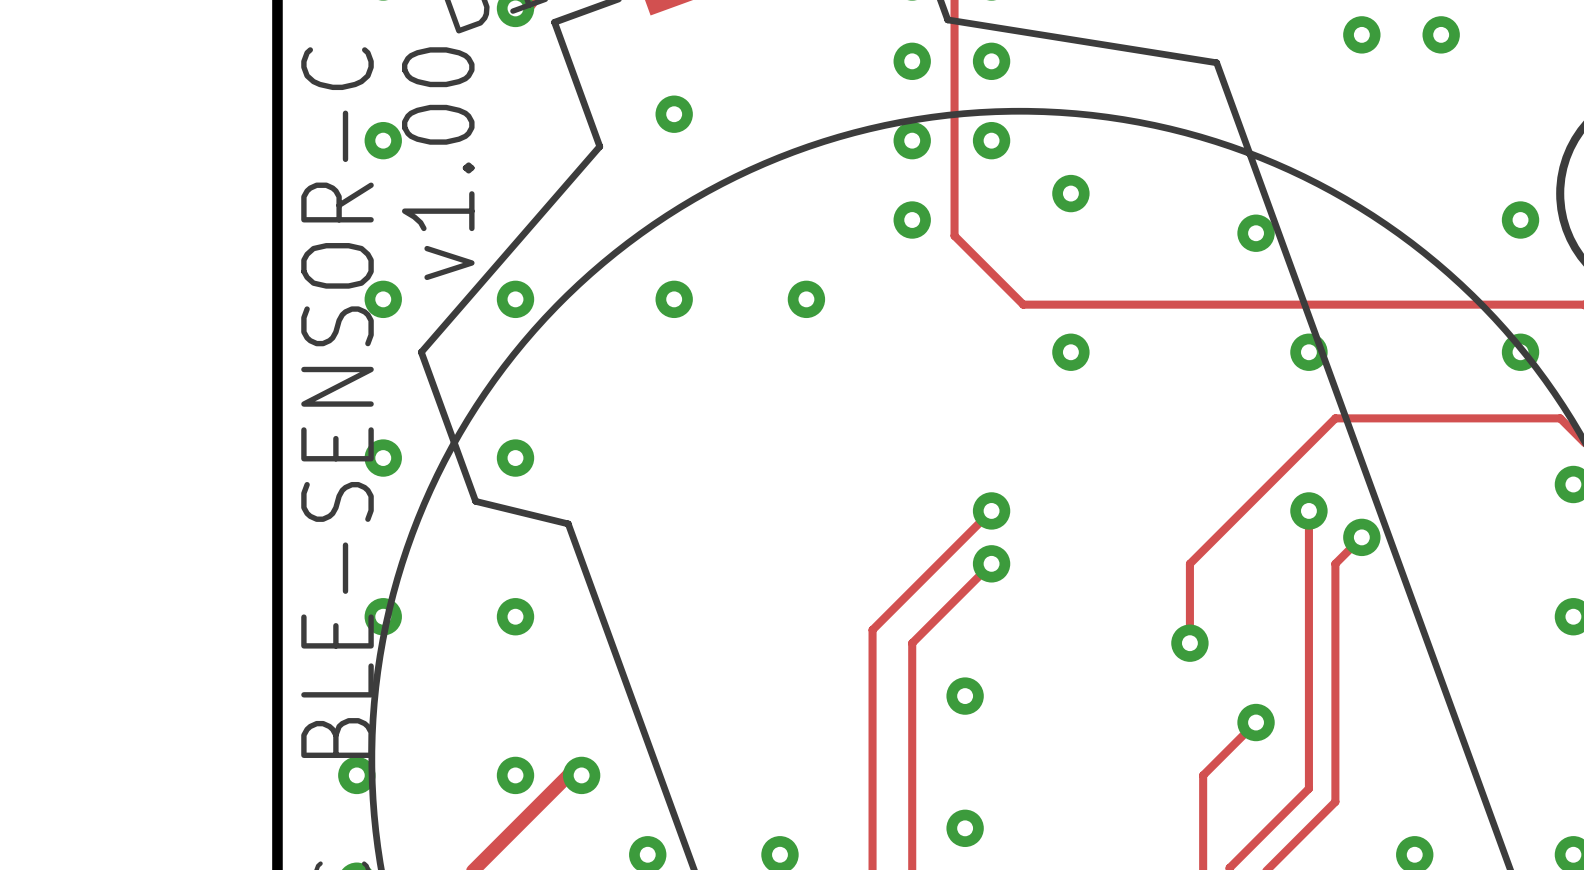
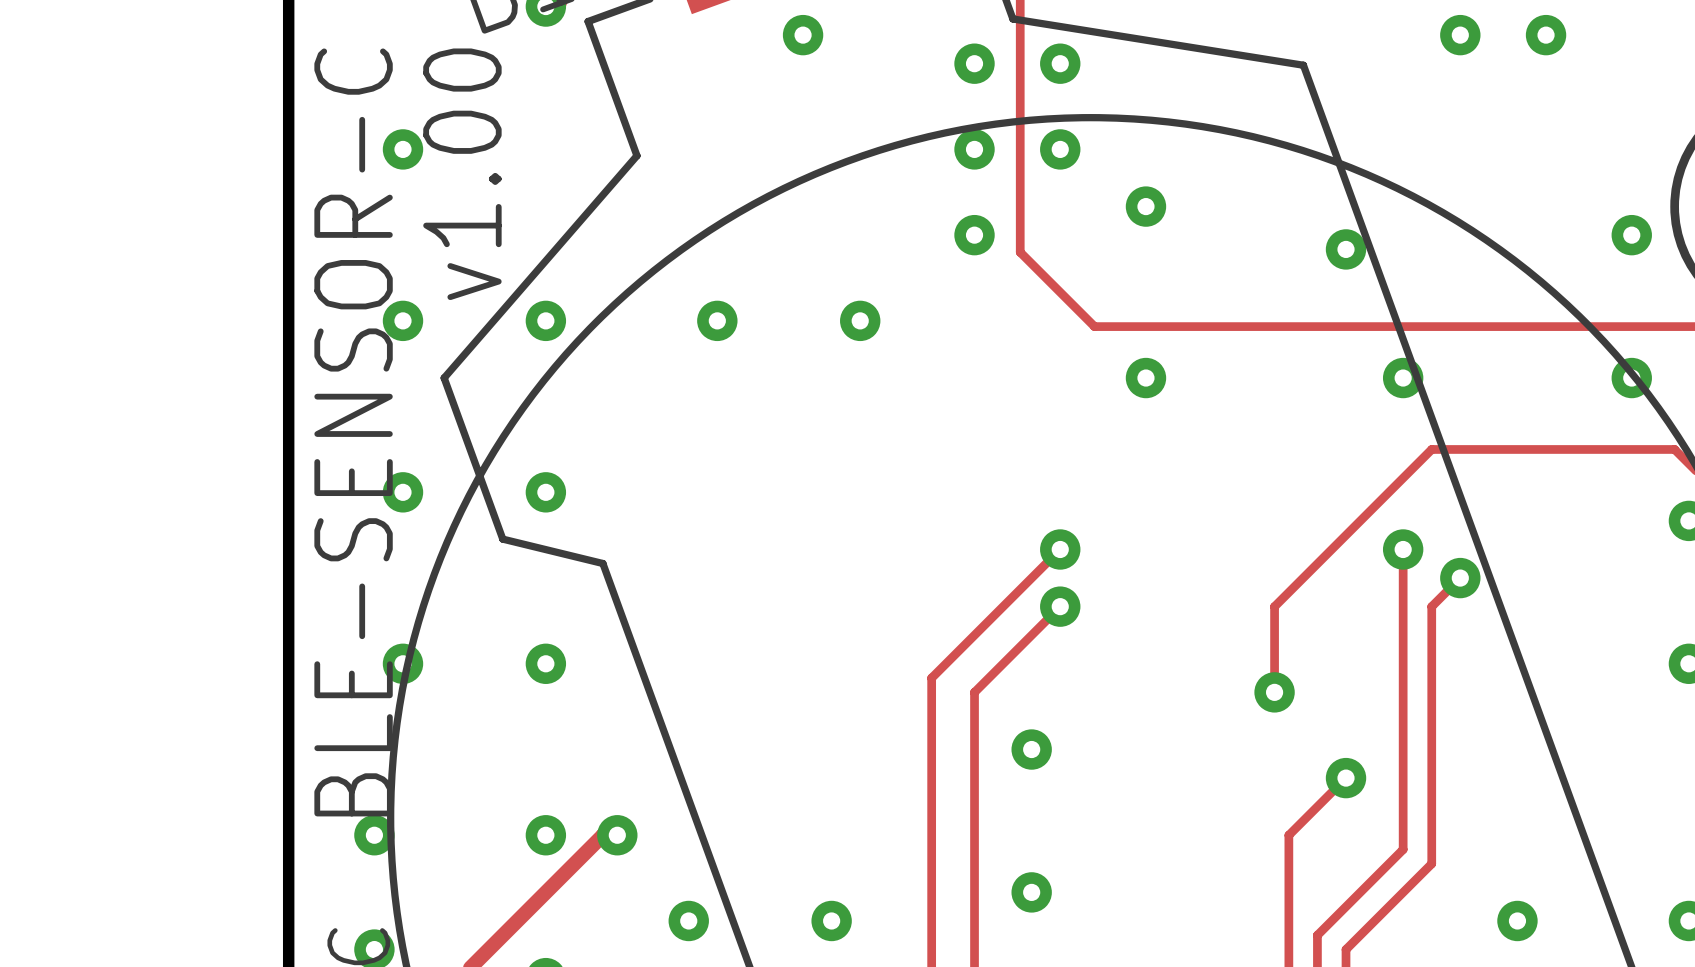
via position: (674, 114) -> (803, 35)

